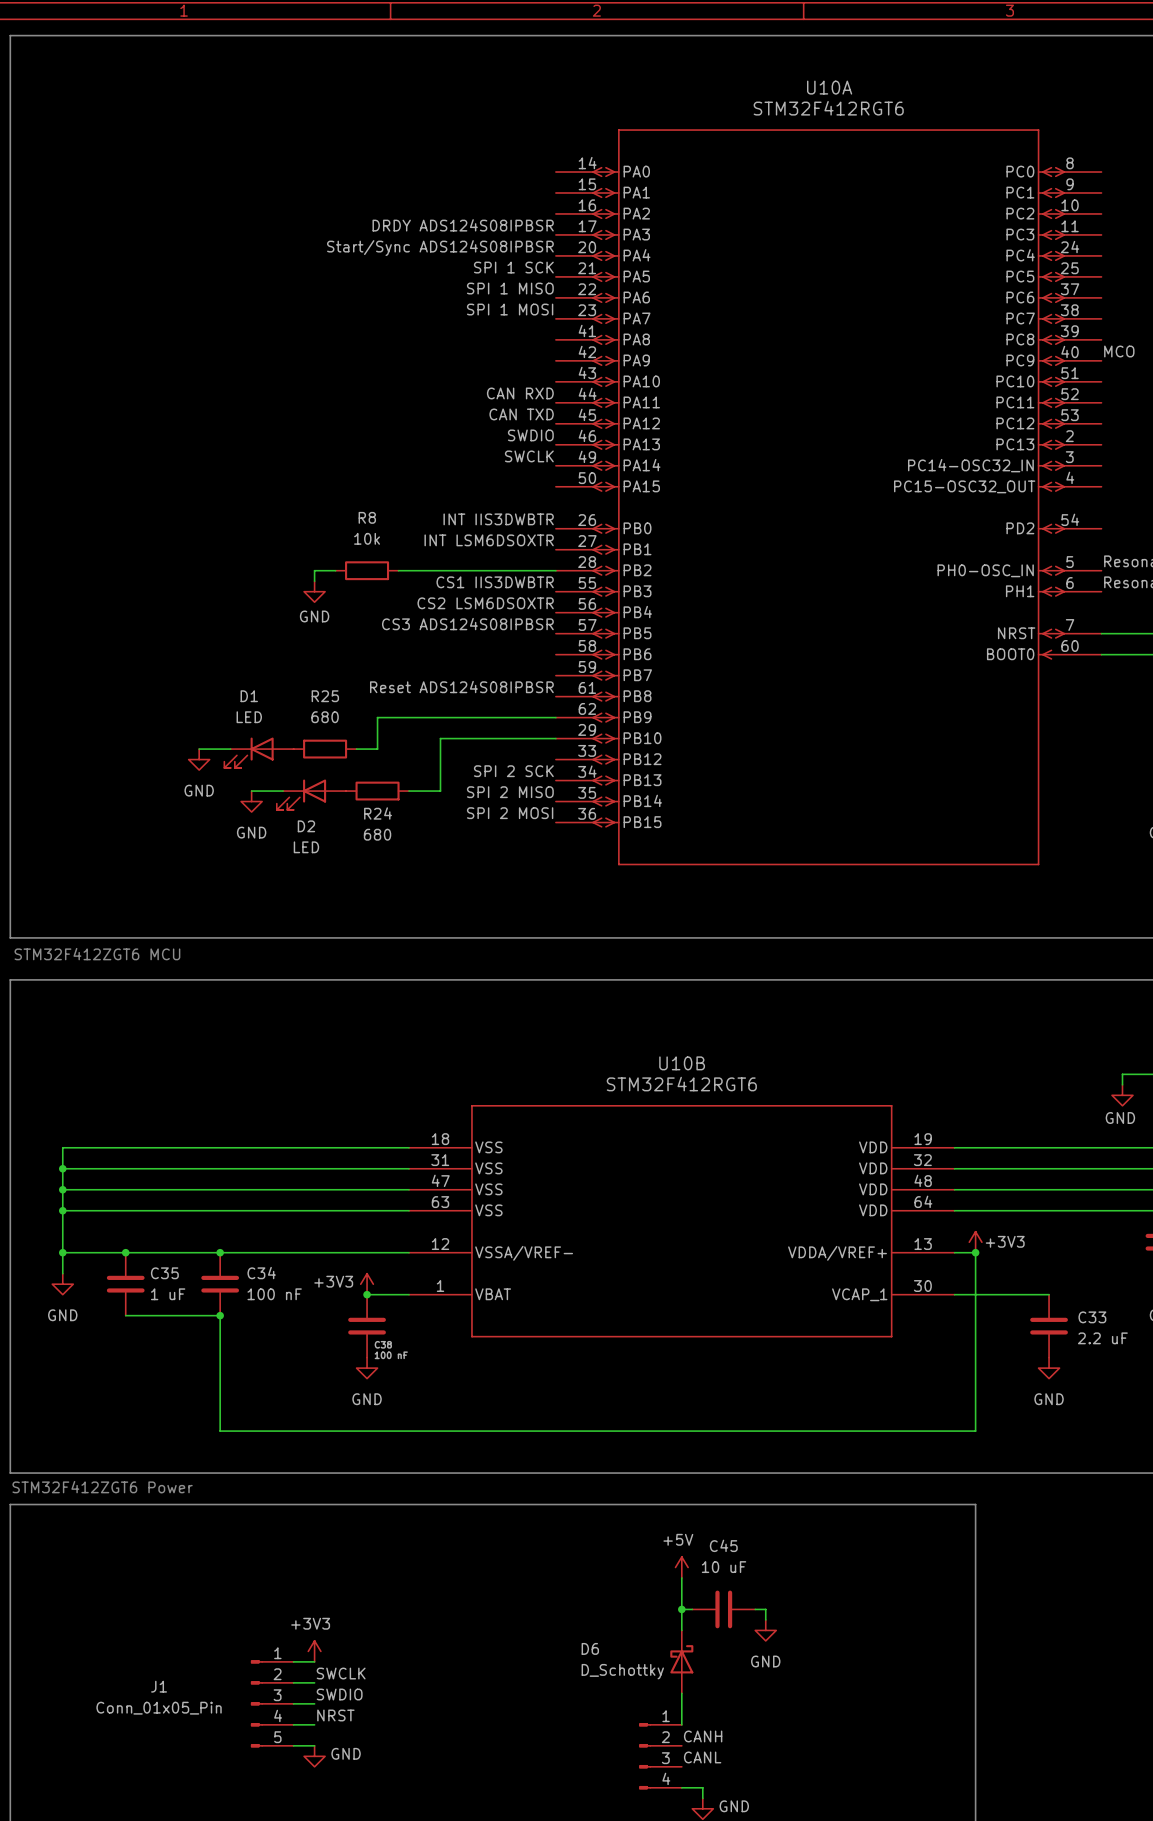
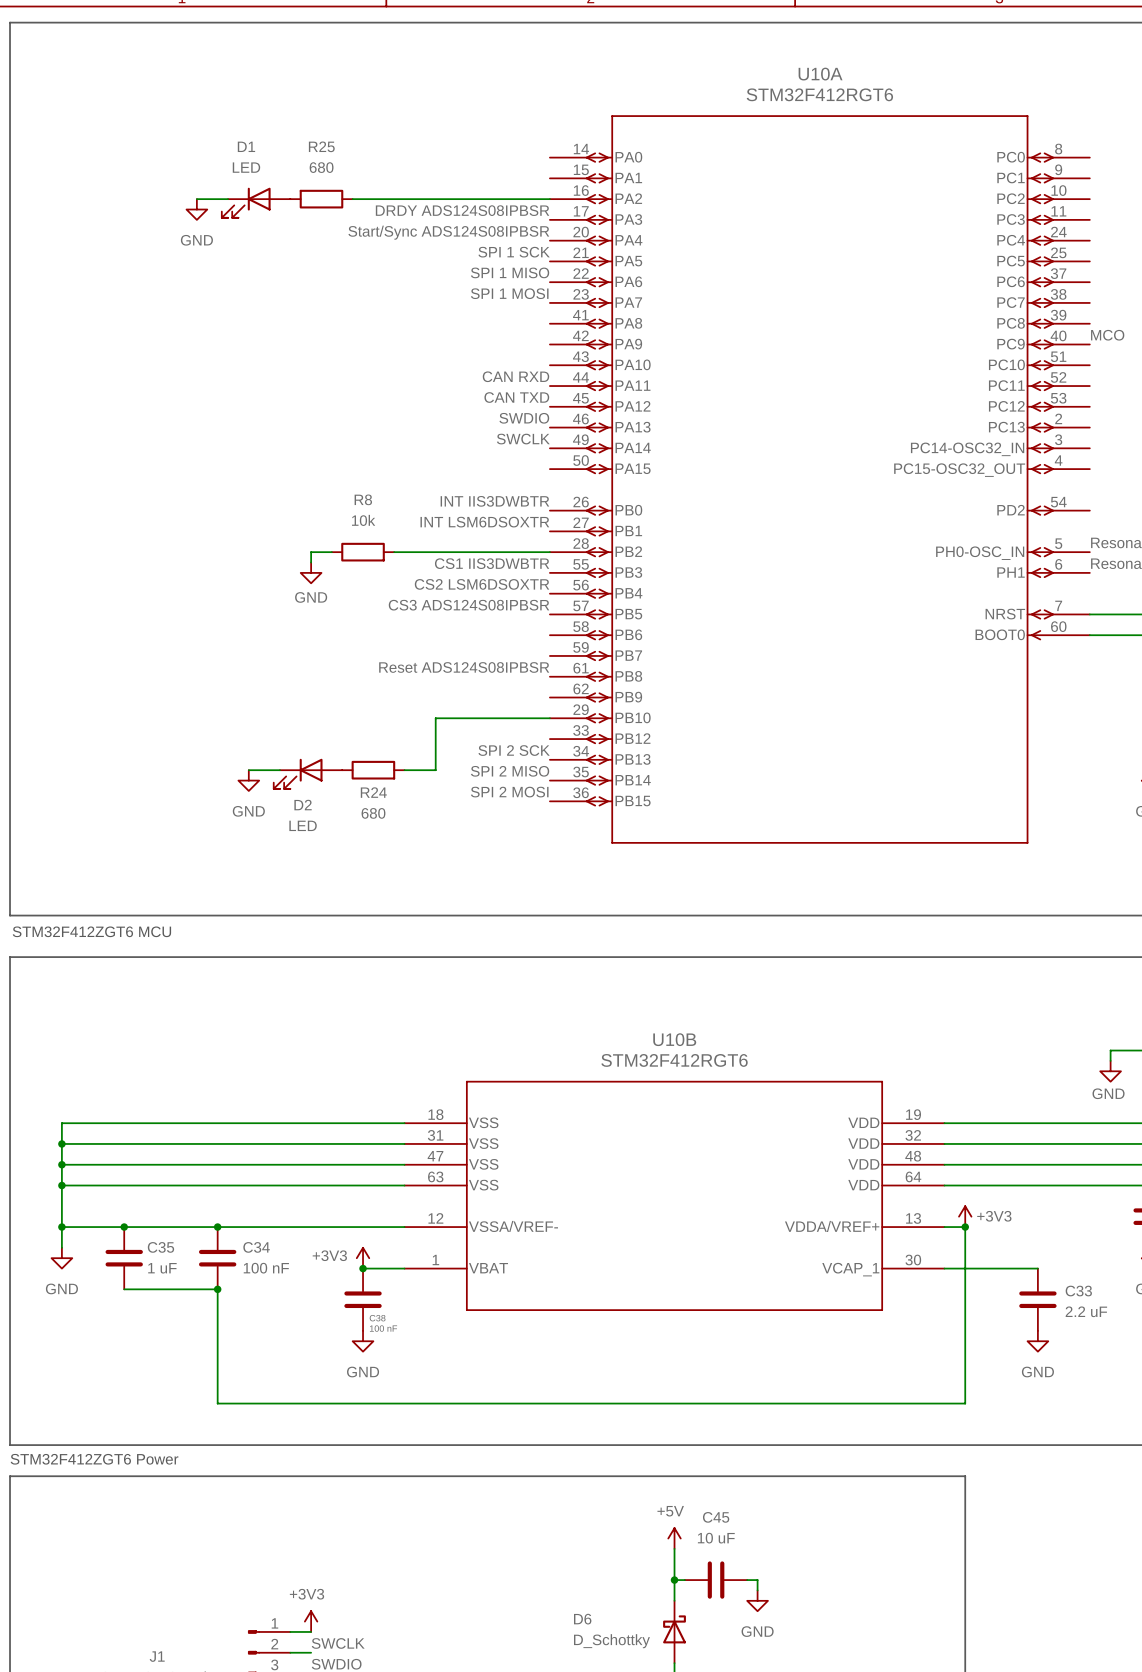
wire: none -> (196, 199) (228, 199)
wire: none -> (352, 199) (549, 199)
power symbol: none -> GND (196, 209)
wire: (555, 717) (377, 717) (377, 749) (356, 749) -> none
wire: (199, 749) (230, 749) -> none
R25 position: (325, 749) -> (321, 199)
D1 position: (258, 752) -> (256, 202)
power symbol: GND (199, 759) -> none

